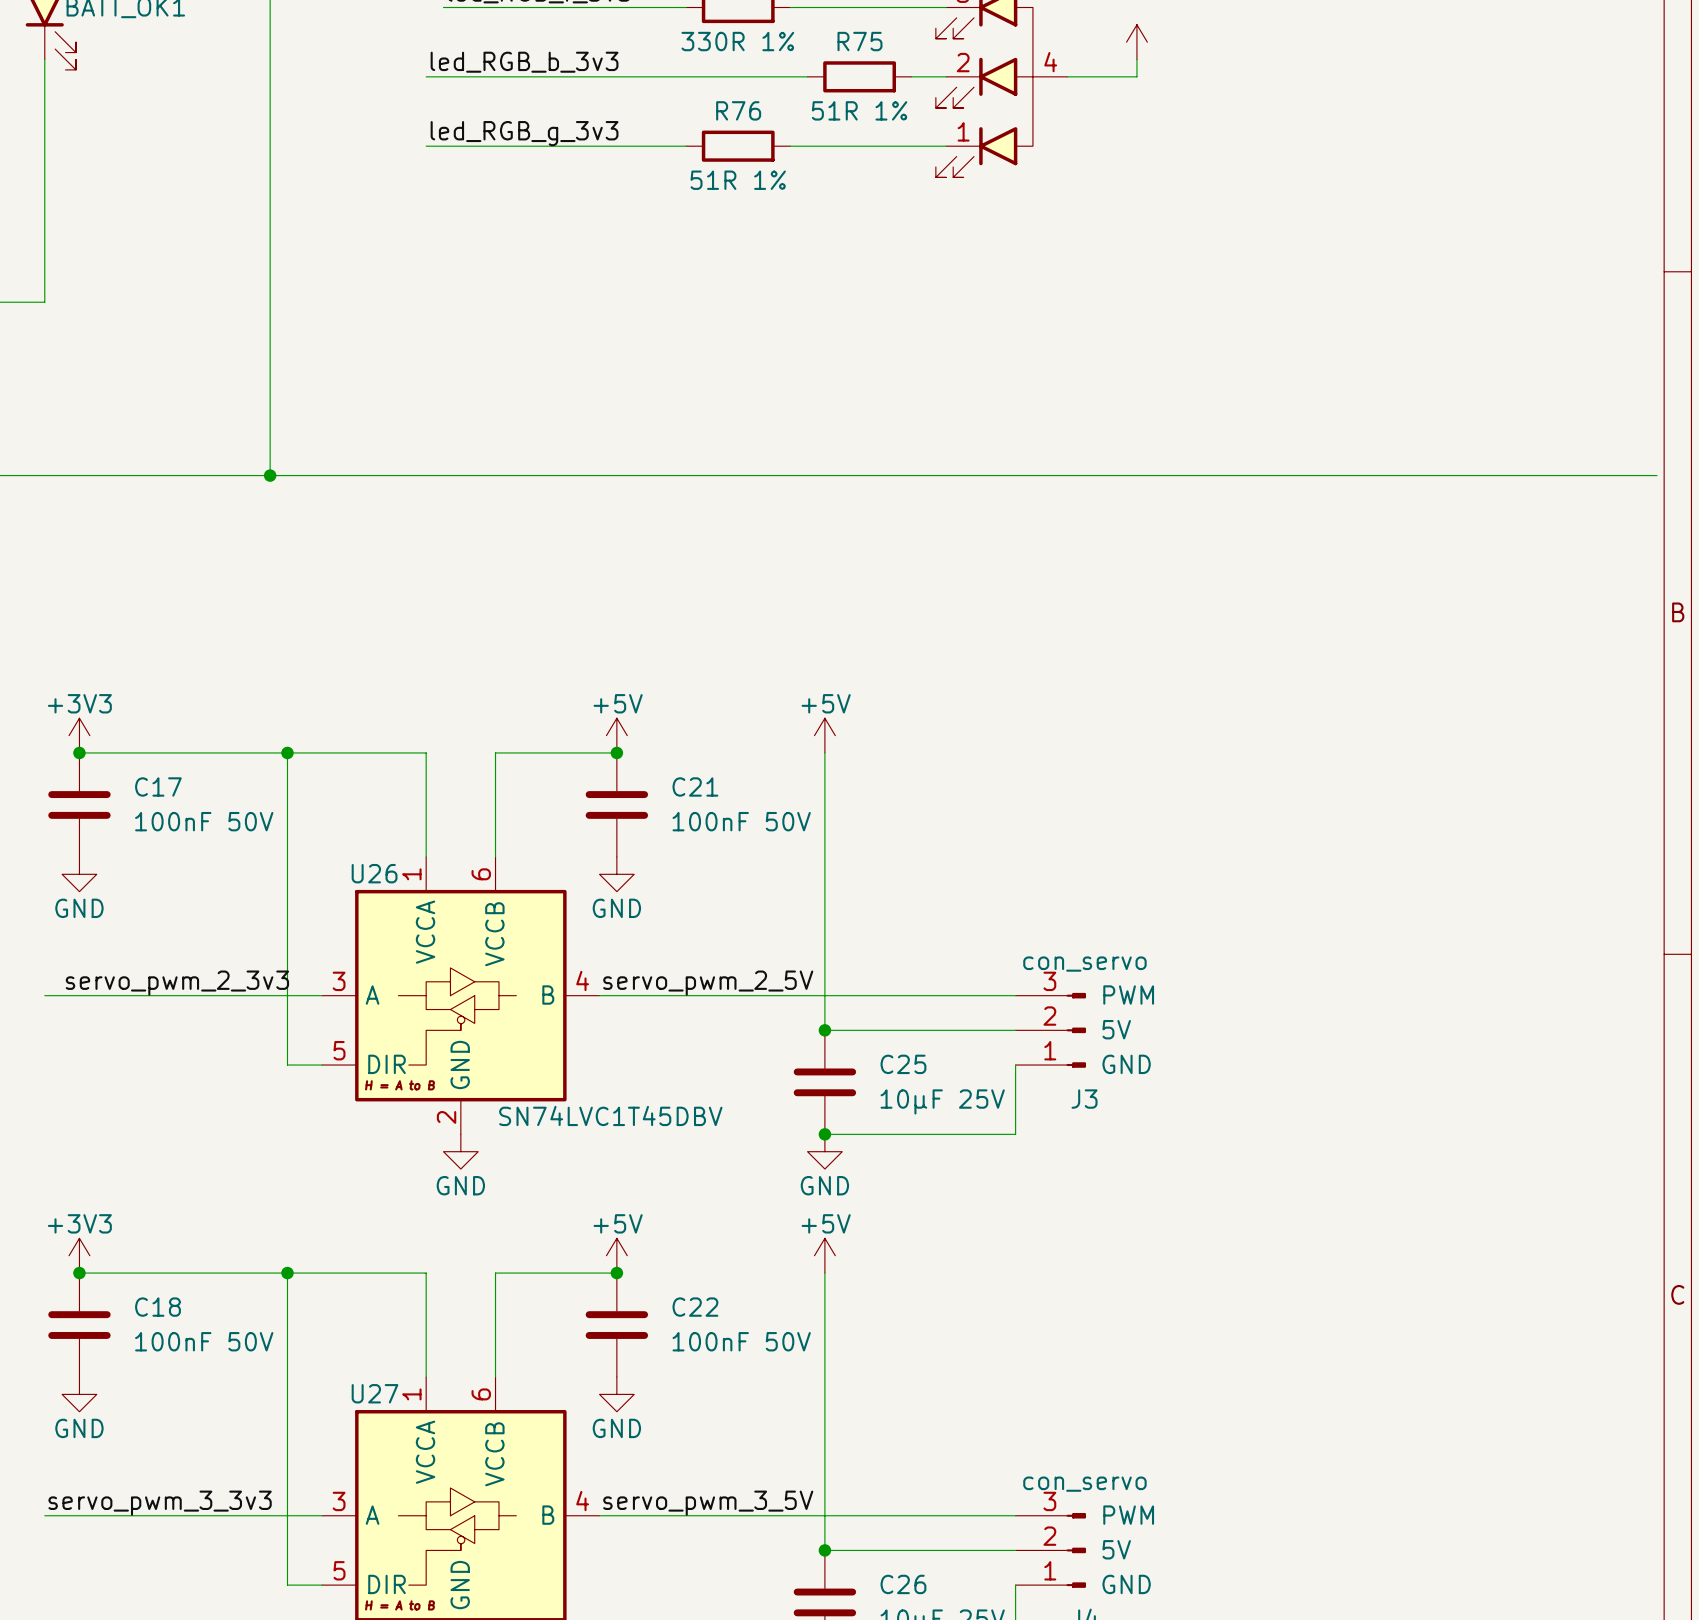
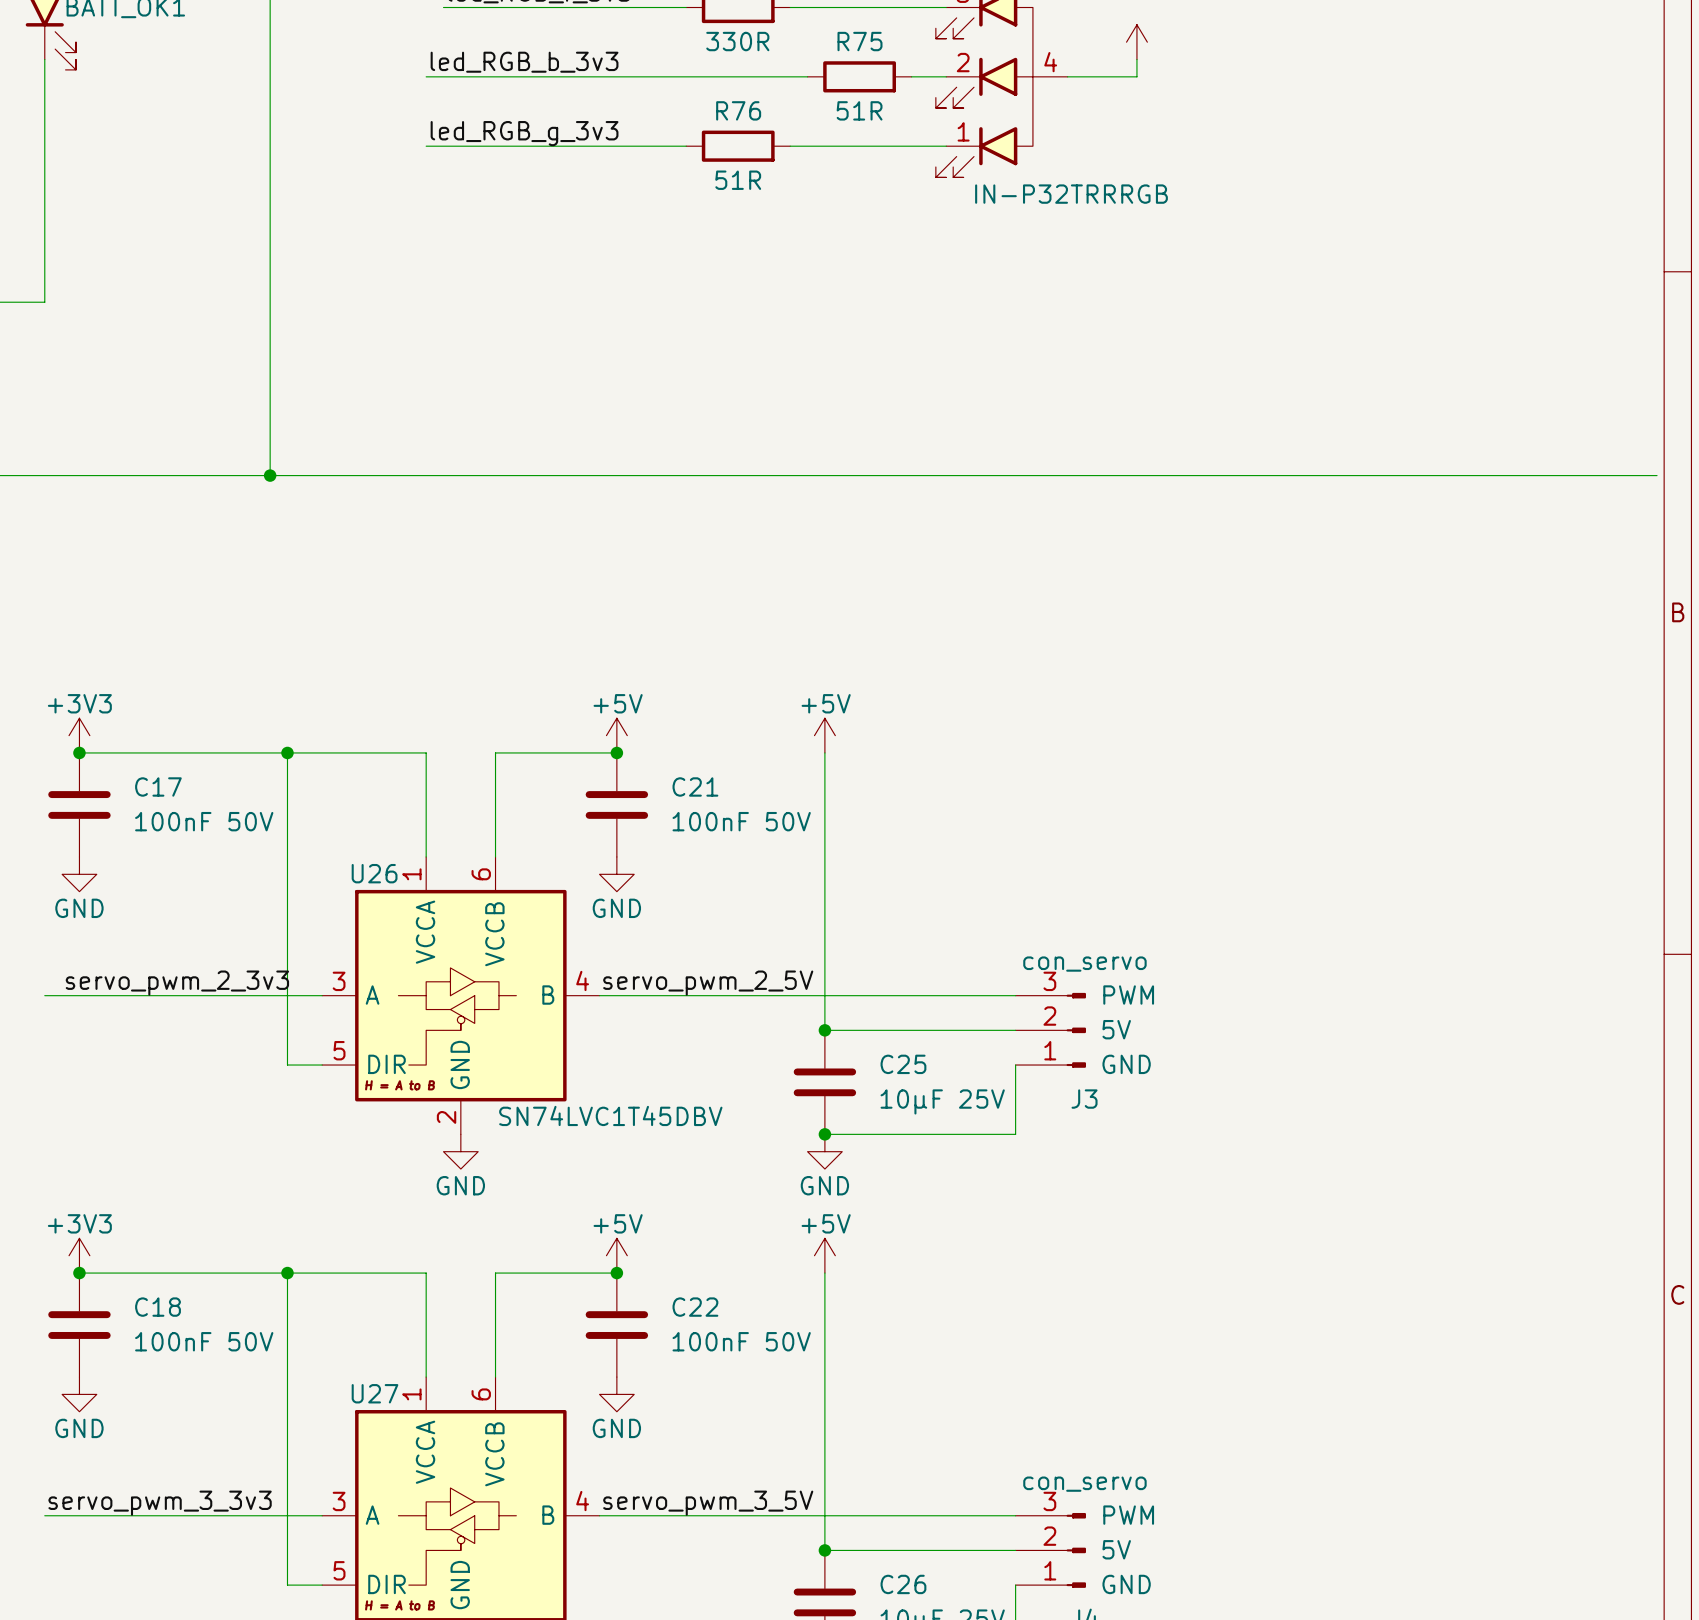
part value: 330R 1% (737, 41) -> 330R (737, 41)
R75 value: 51R 1% (859, 110) -> 51R (859, 110)
R76 value: 51R 1% (738, 180) -> 51R (738, 180)
part value: none -> IN-P32TRRRGB (1071, 194)

